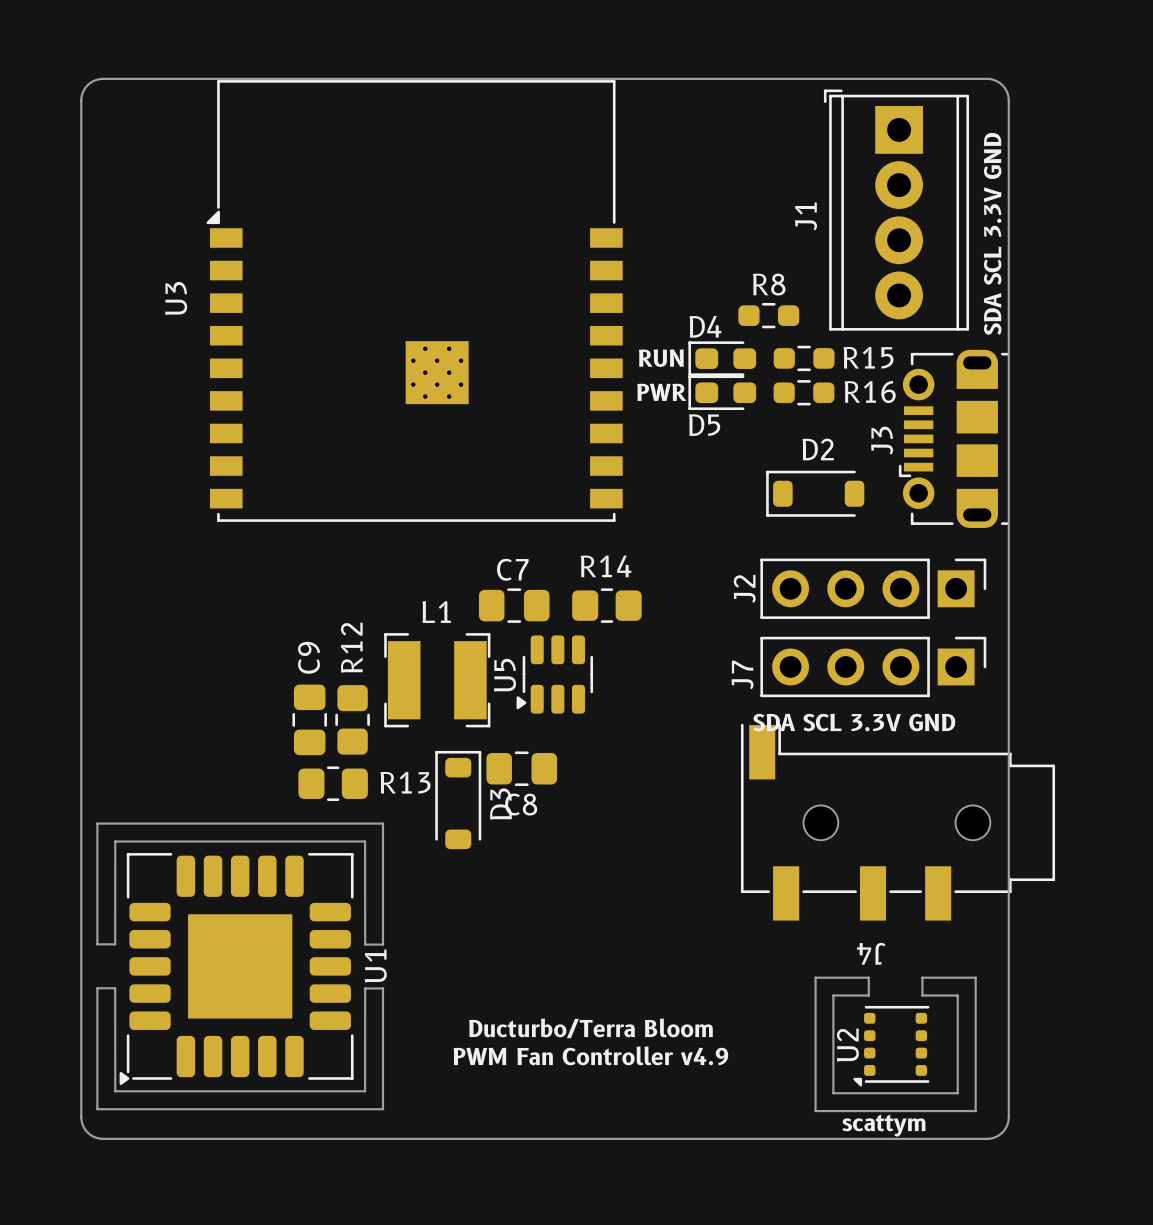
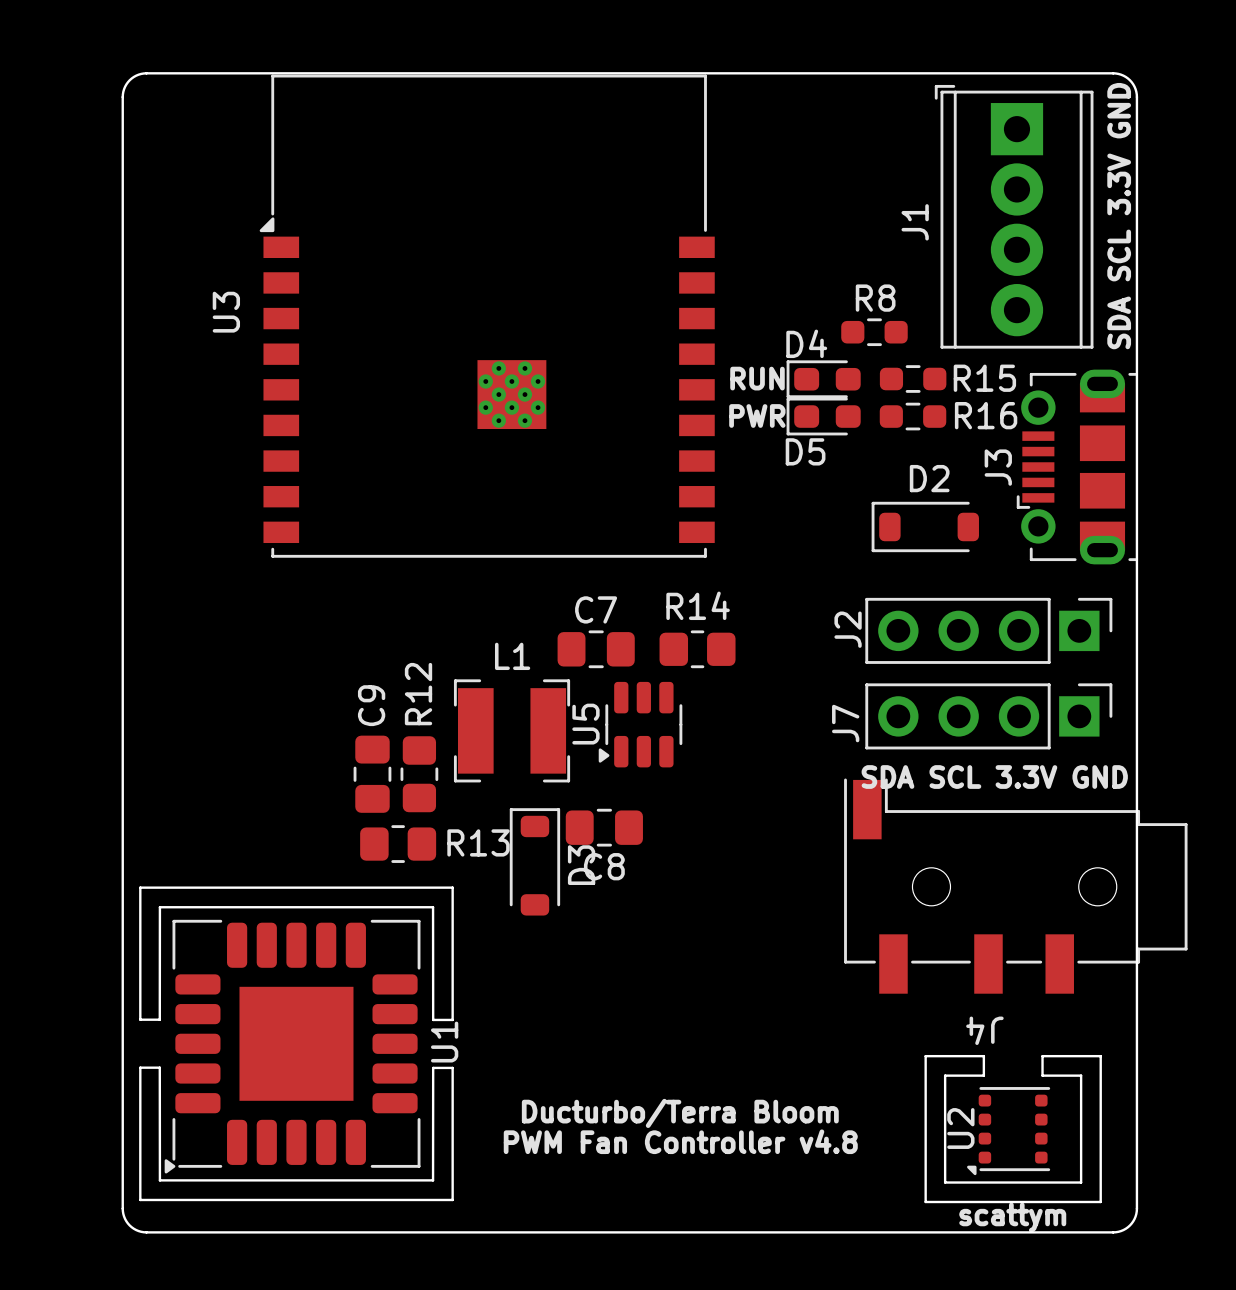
text: PWM Fan Controller v4.9 (590, 1055) -> PWM Fan Controller v4.8 (680, 1141)

